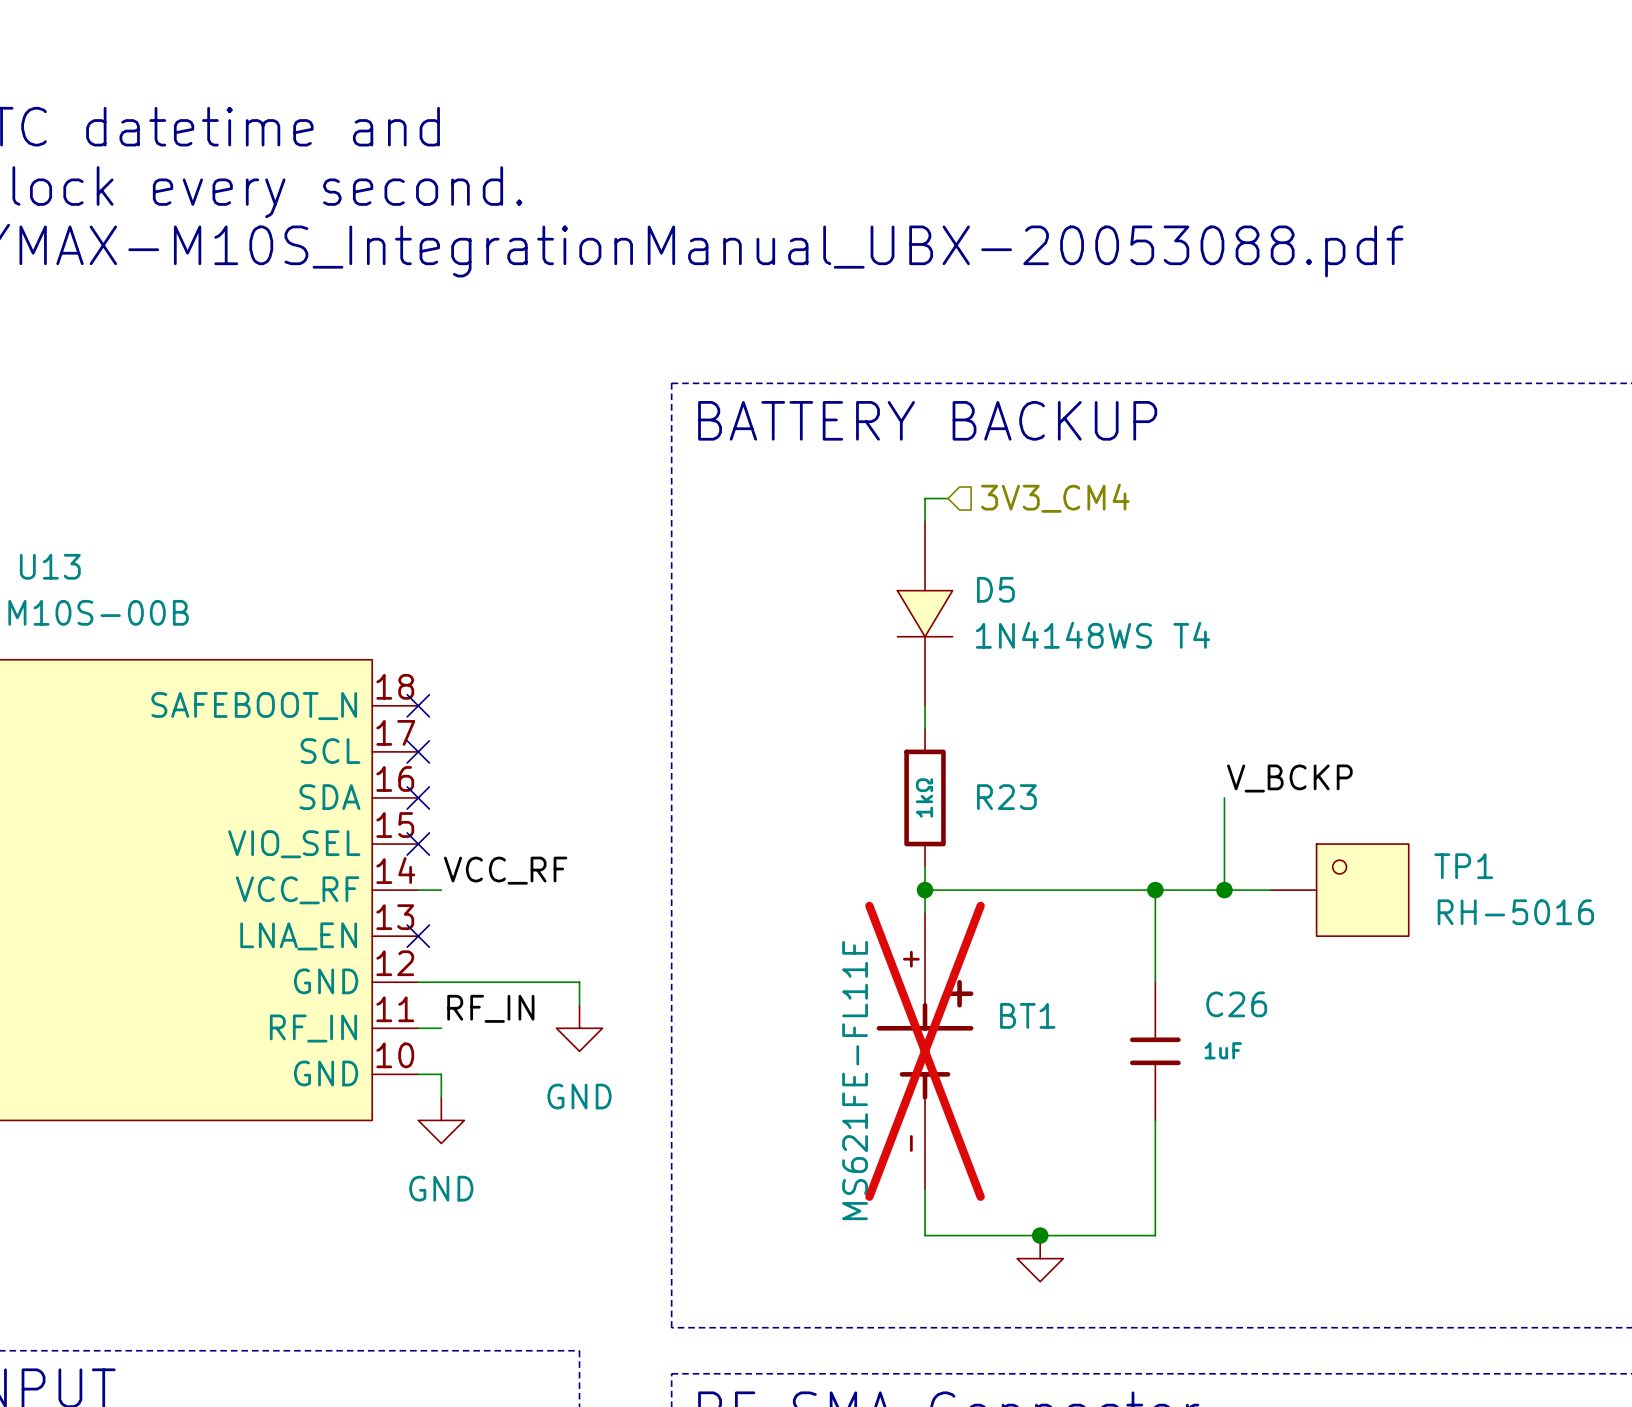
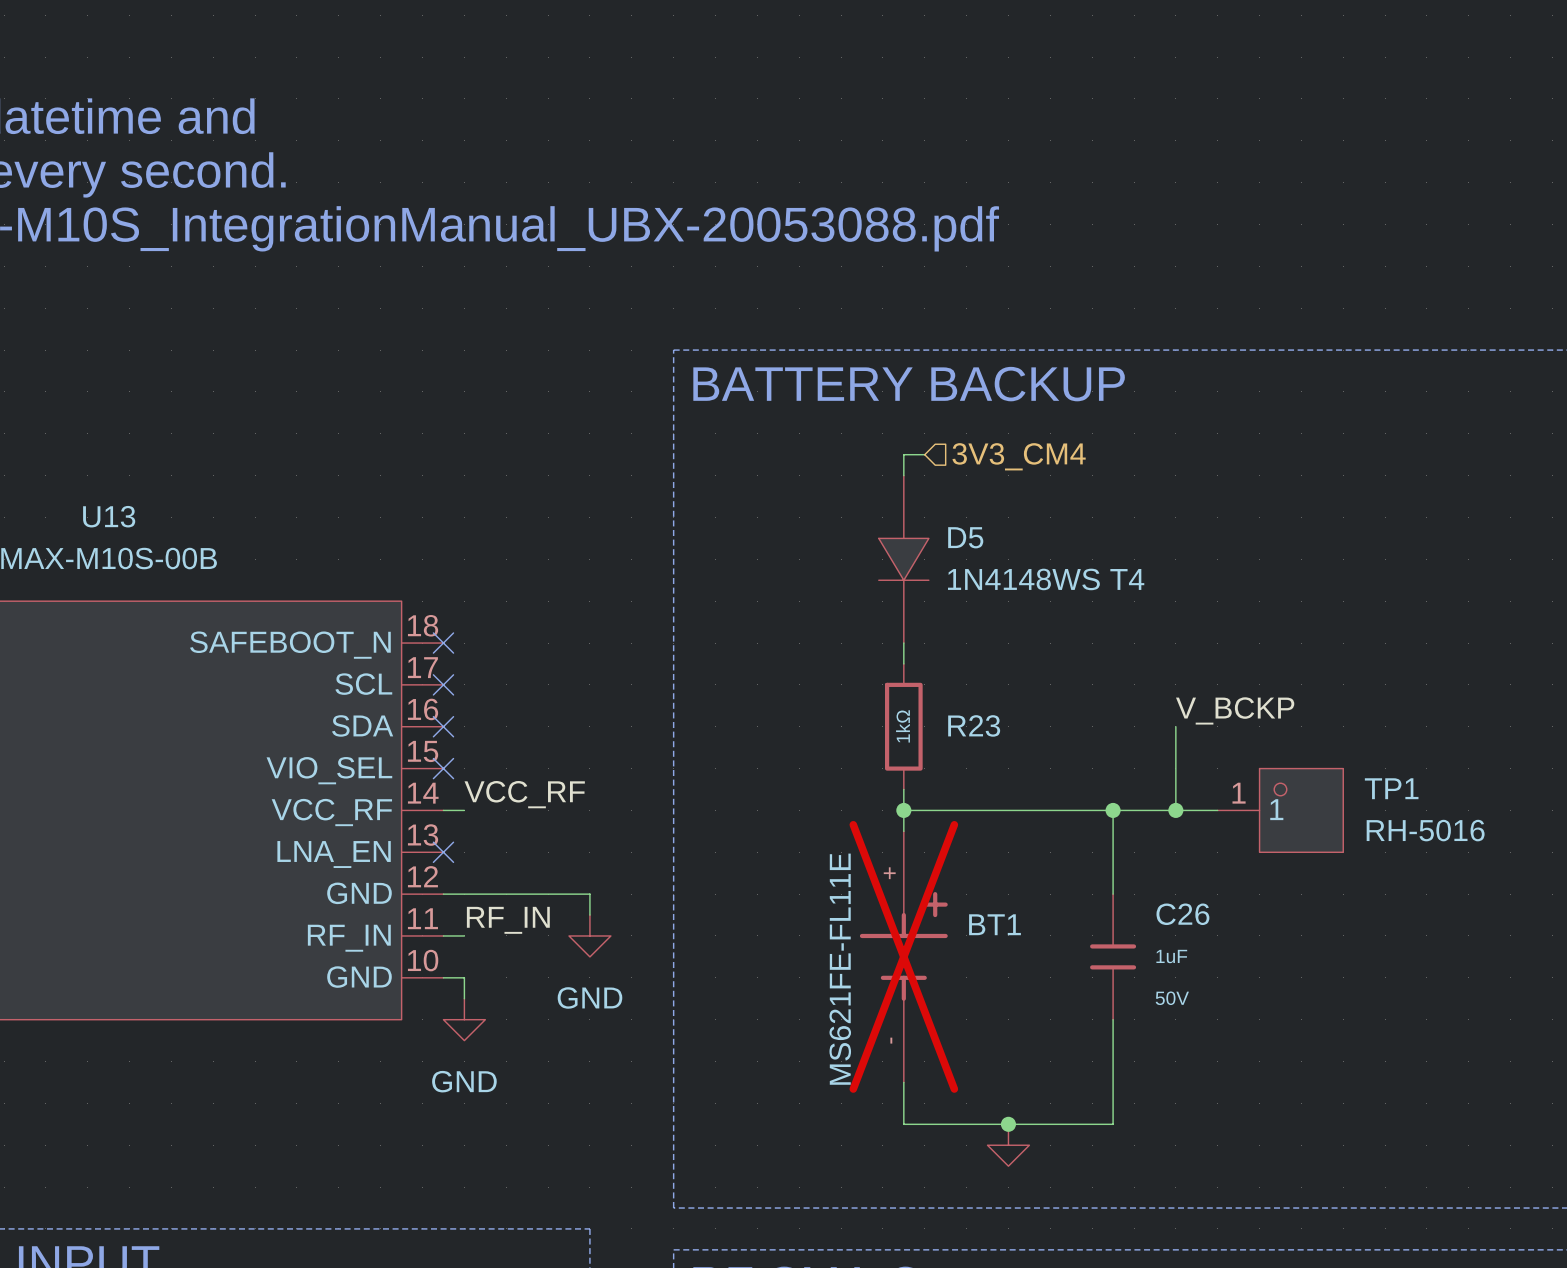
TP1 pin number: none -> 1 (1239, 793)
TP1 pin name: none -> 1 (1276, 809)
C26 text: none -> 50V (1172, 998)

